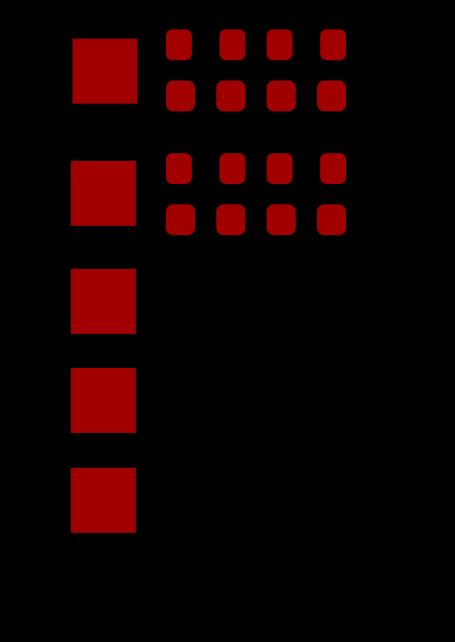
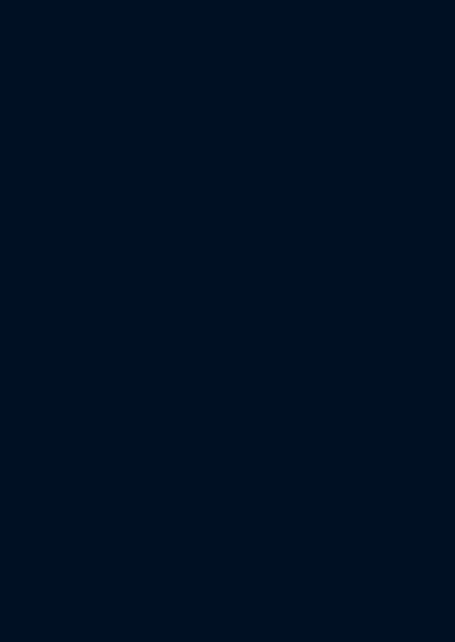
part: (205, 44) -> none
part: (306, 44) -> none
part: (105, 71) -> none
part: (205, 95) -> none
part: (306, 95) -> none
part: (205, 168) -> none
part: (306, 168) -> none
part: (103, 193) -> none
part: (205, 219) -> none
part: (306, 219) -> none
part: (103, 301) -> none
part: (103, 400) -> none
part: (103, 500) -> none

